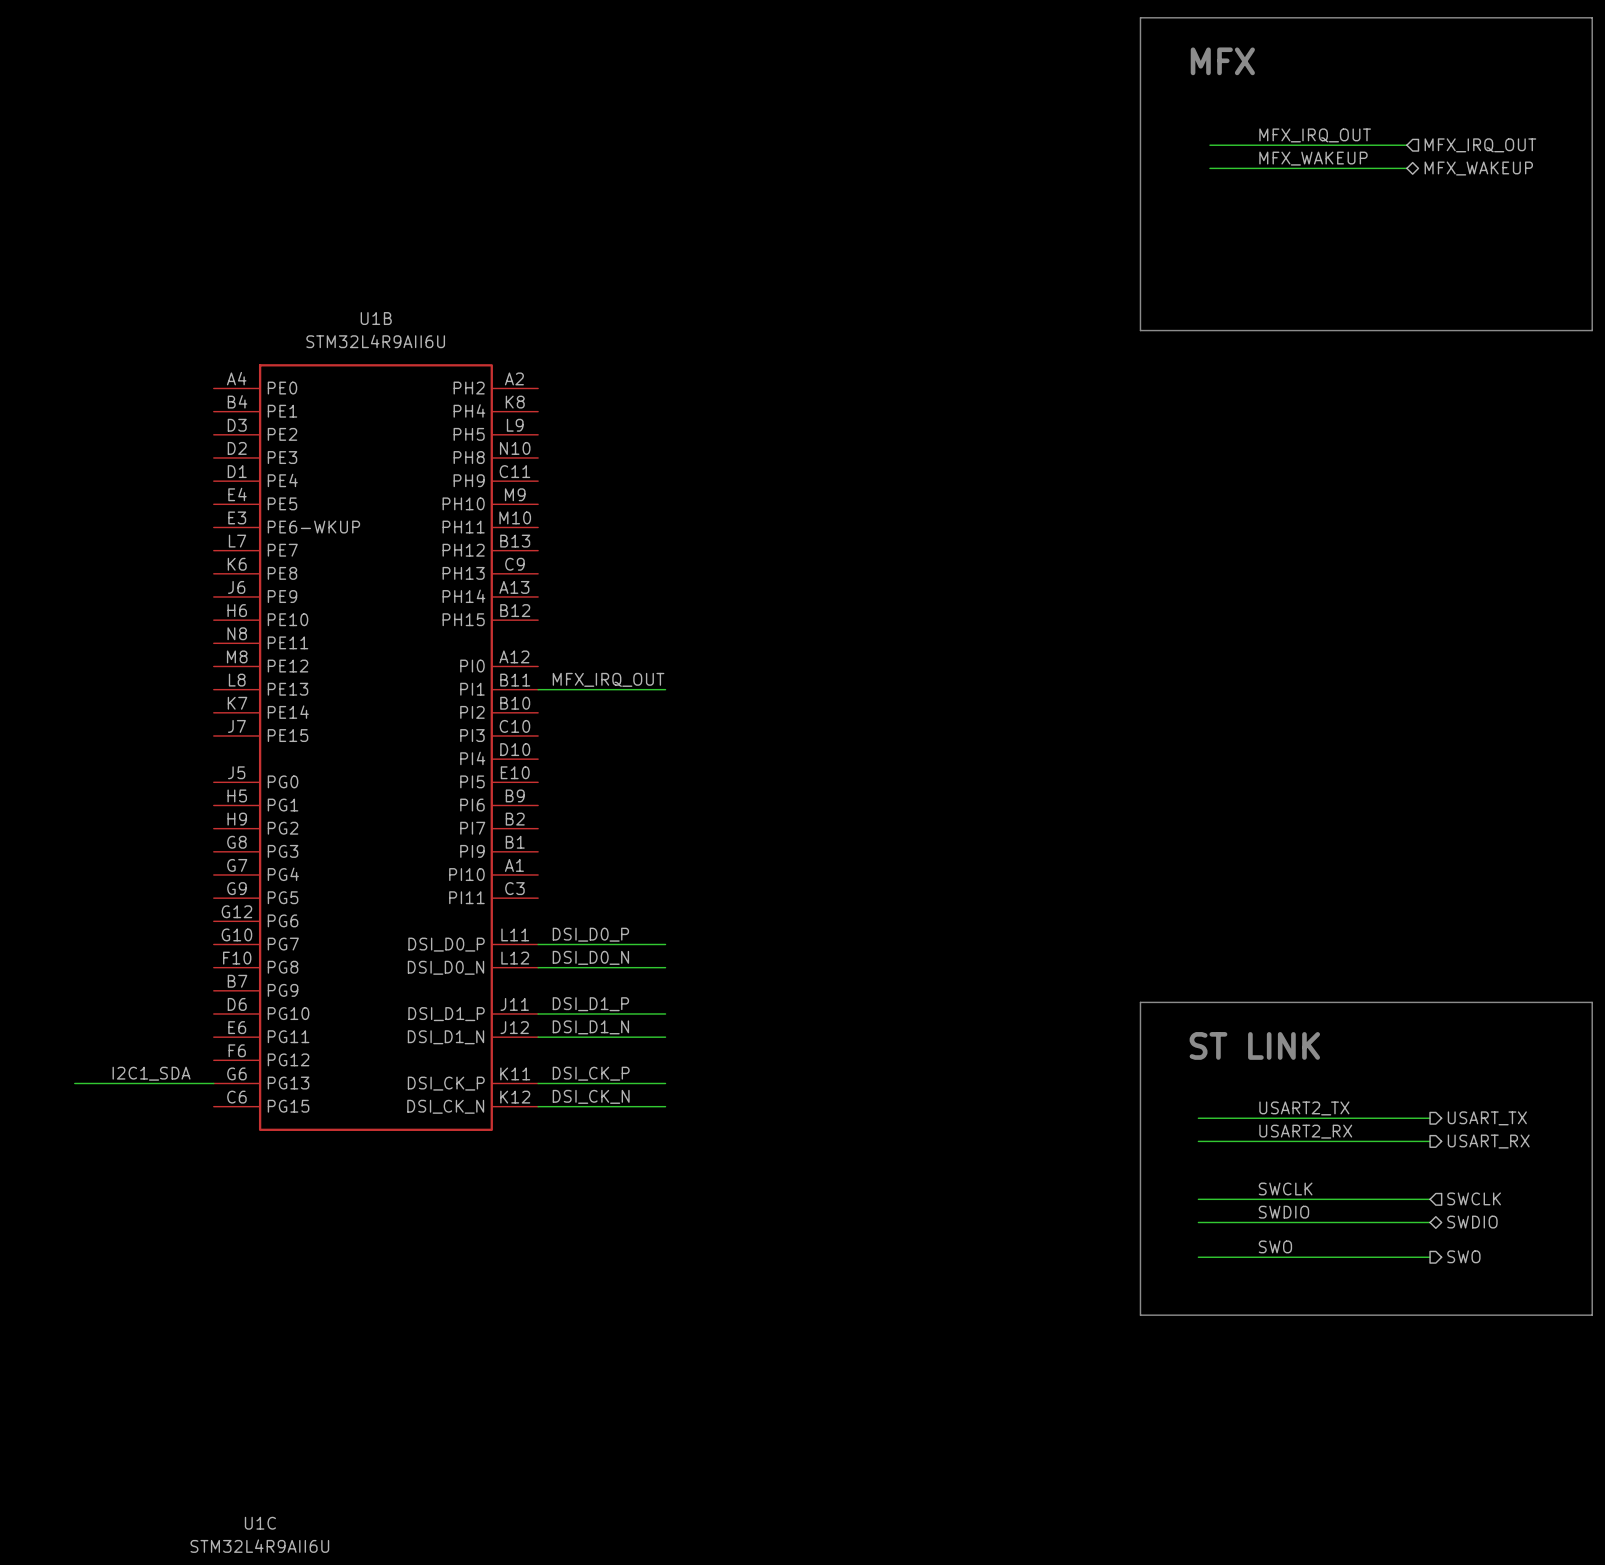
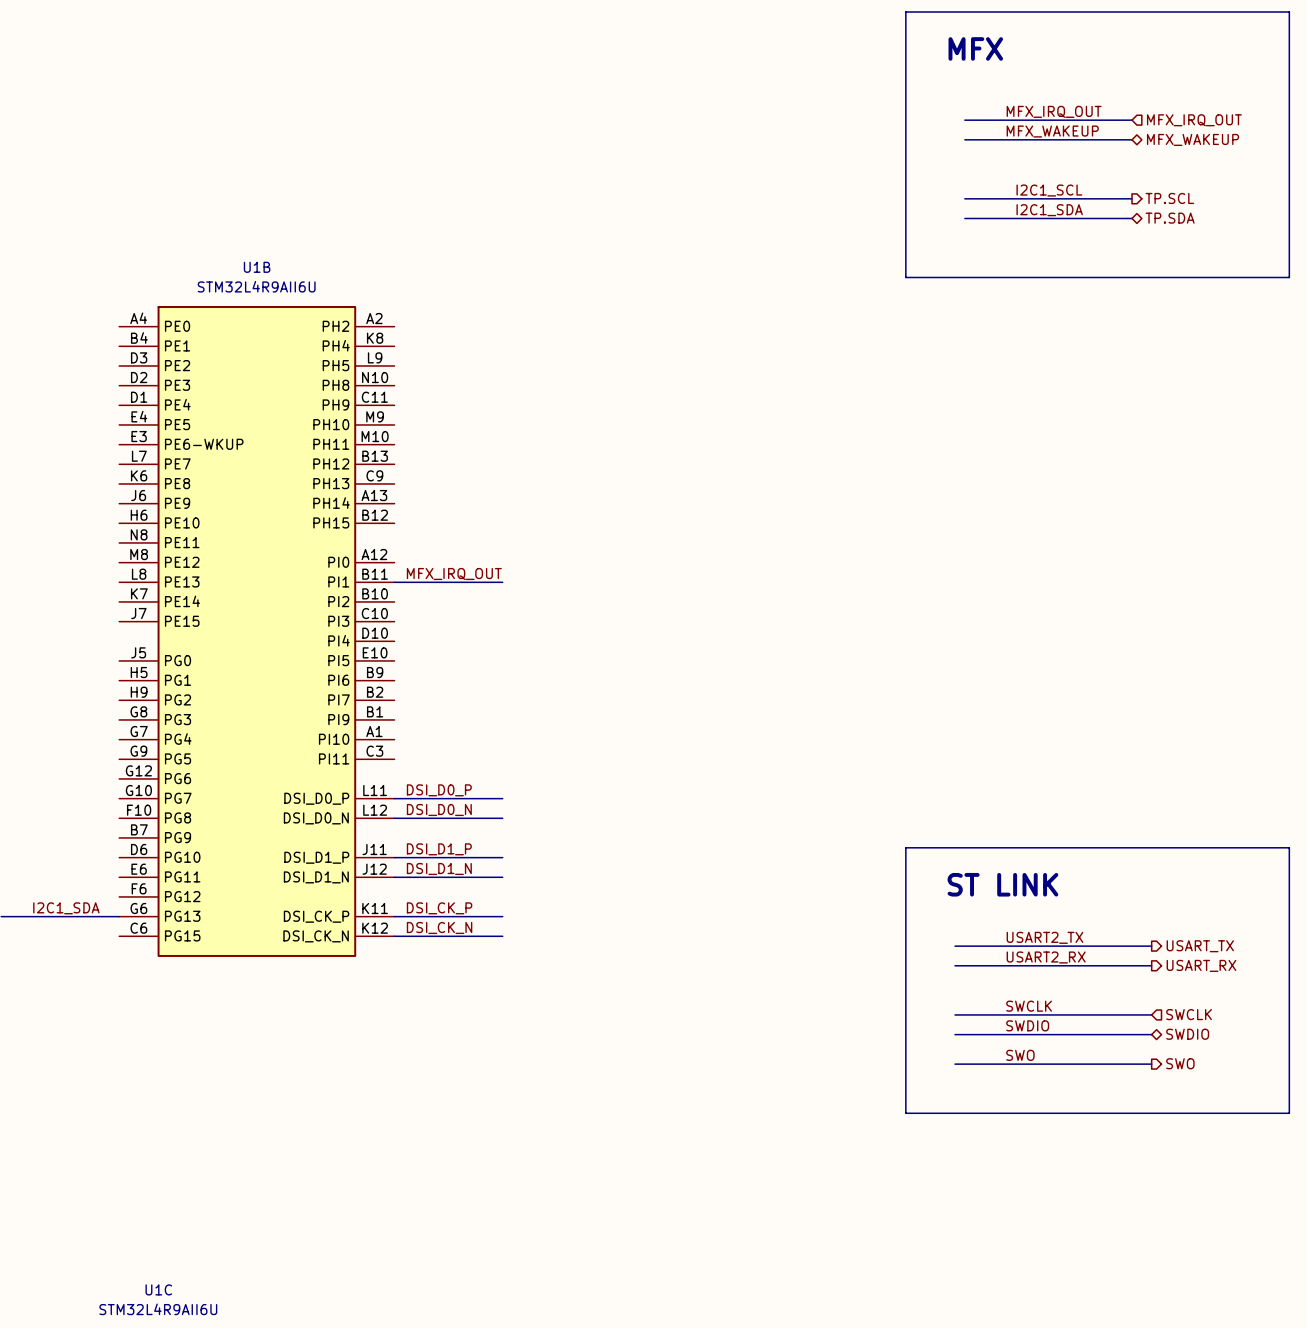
label: none -> I2C1_SCL (1049, 190)
wire: none -> (964, 198) (1132, 198)
hierarchical label: none -> TP.SCL (1169, 198)
label: none -> I2C1_SDA (1049, 210)
hierarchical label: none -> TP.SDA (1170, 218)
wire: none -> (964, 218) (1132, 218)

